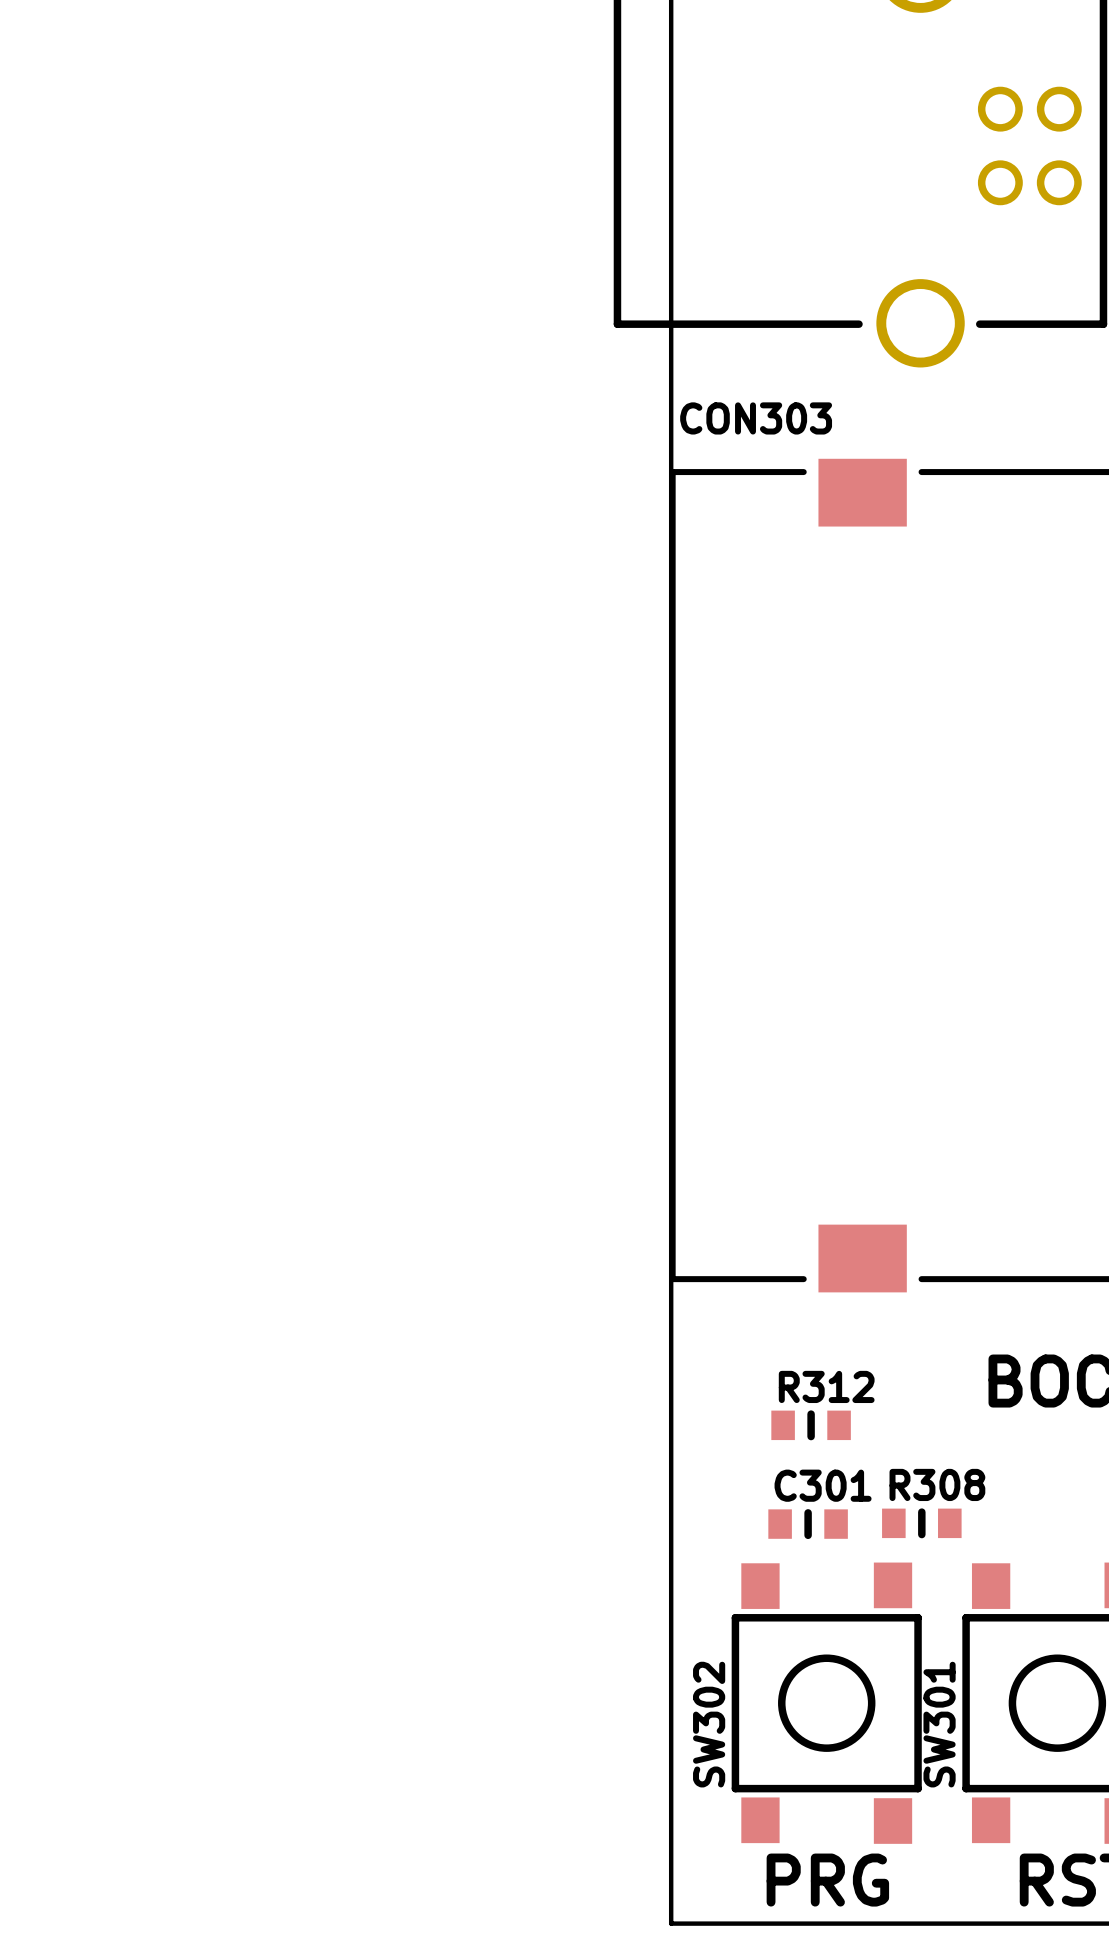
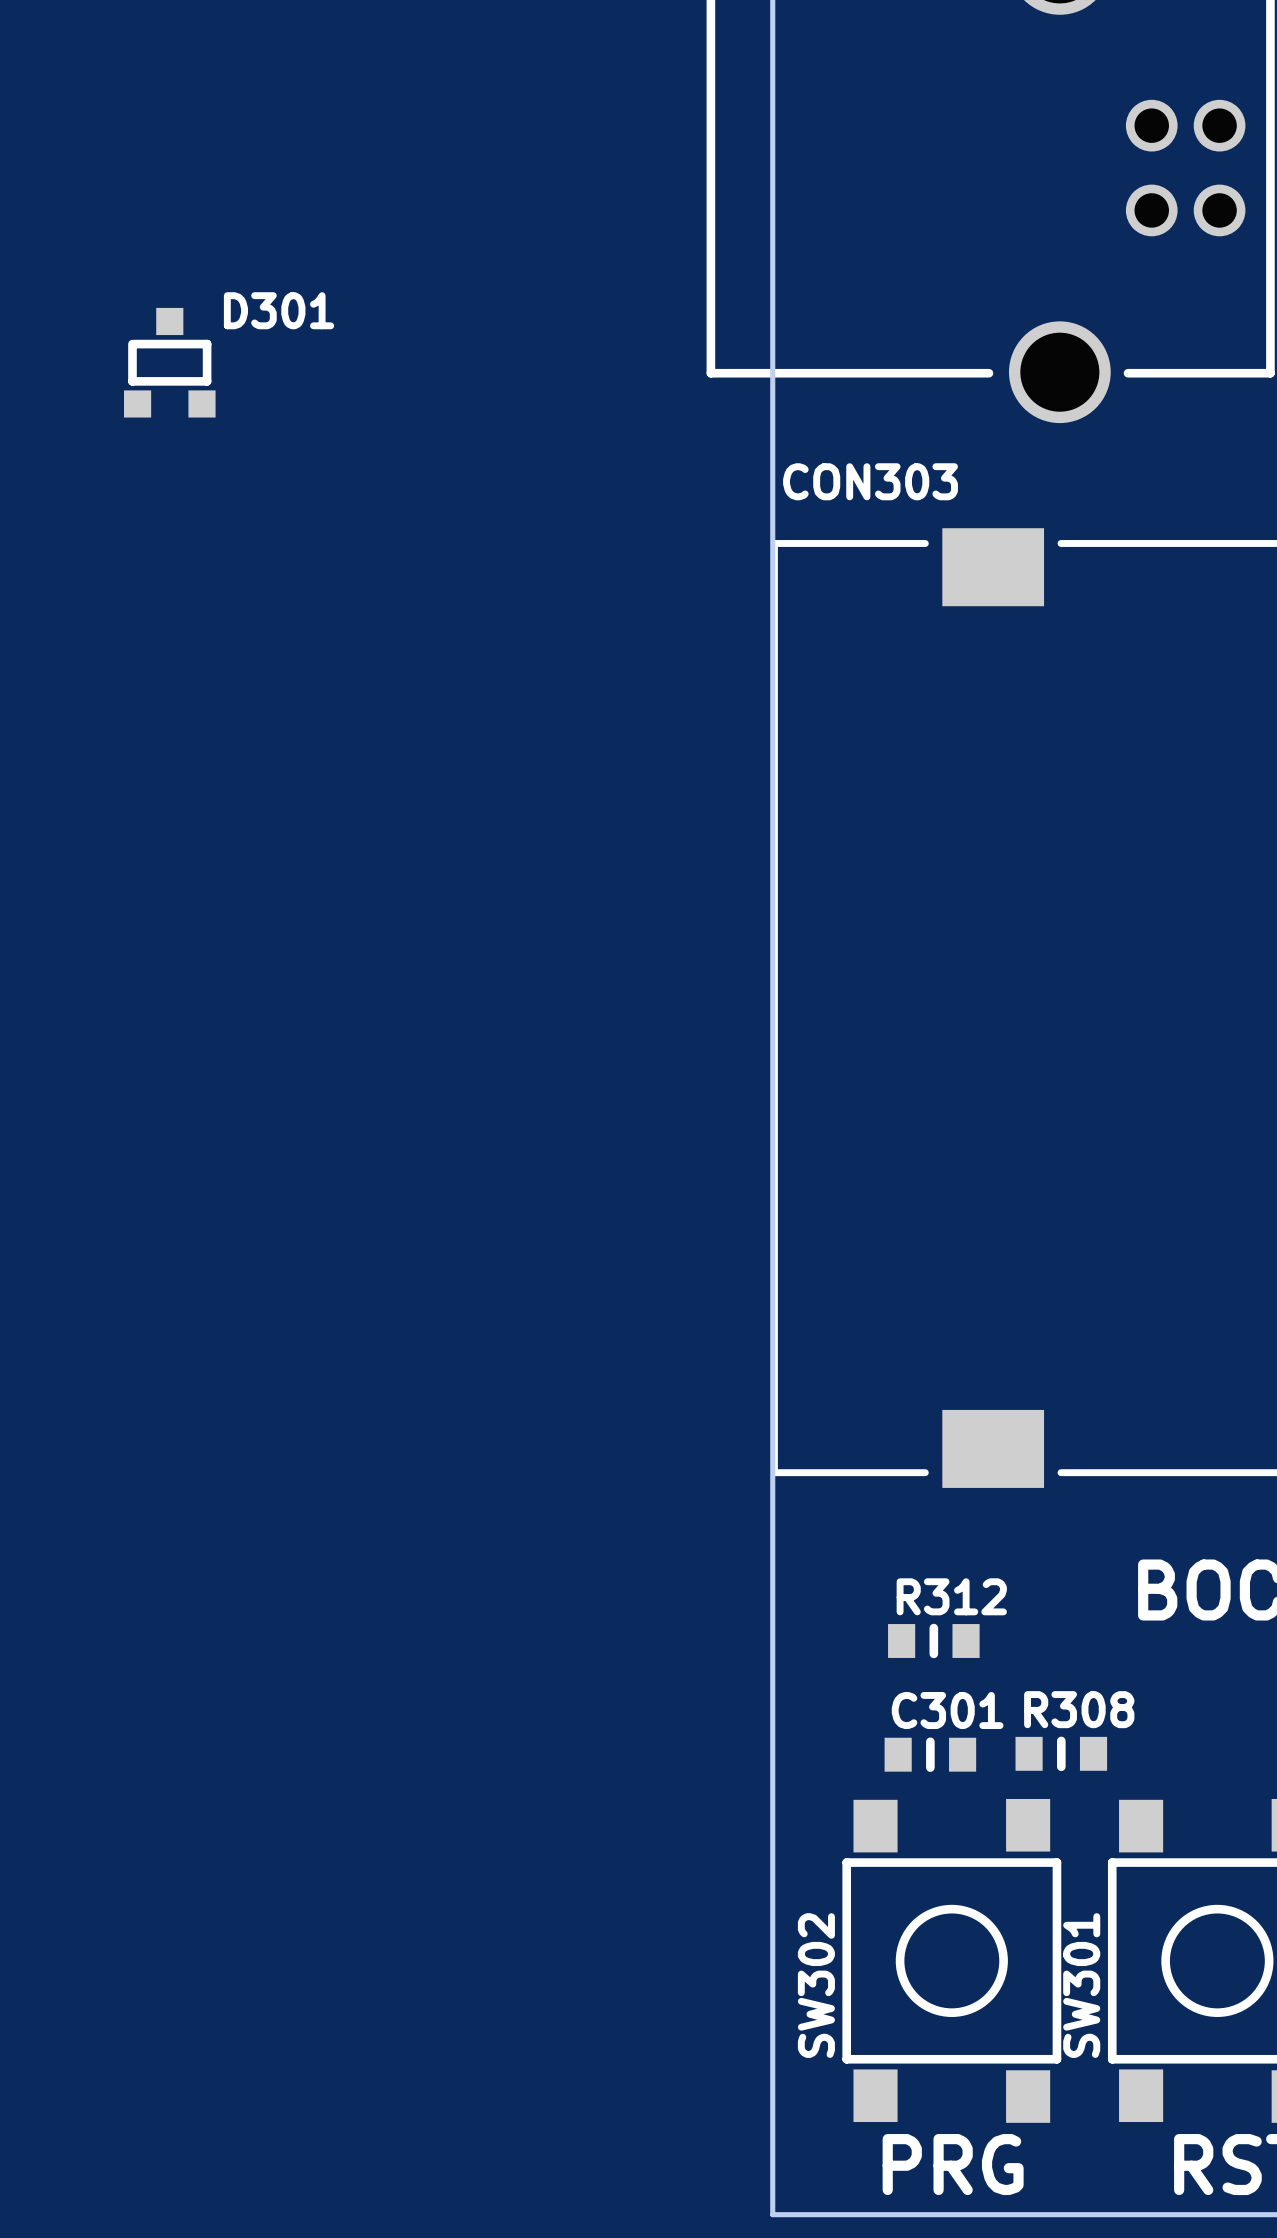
D301: none -> (169, 362)

